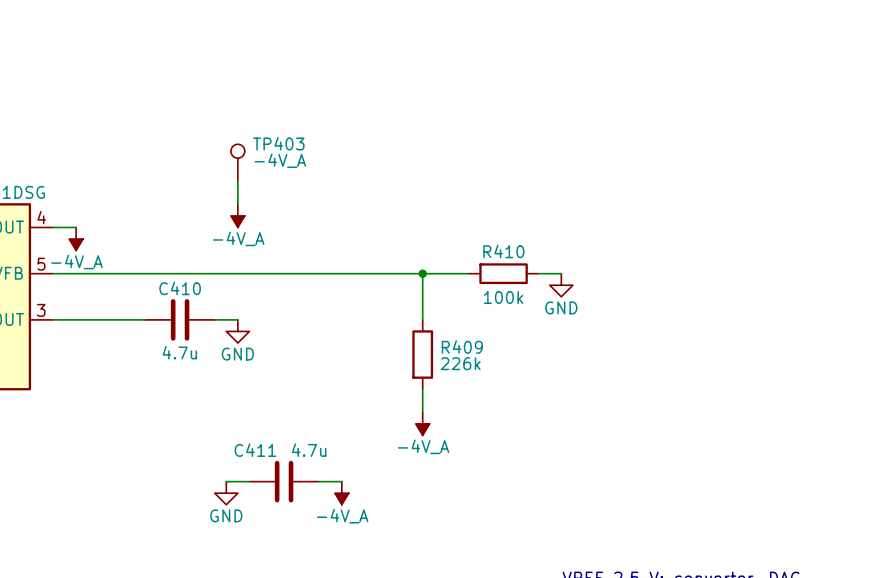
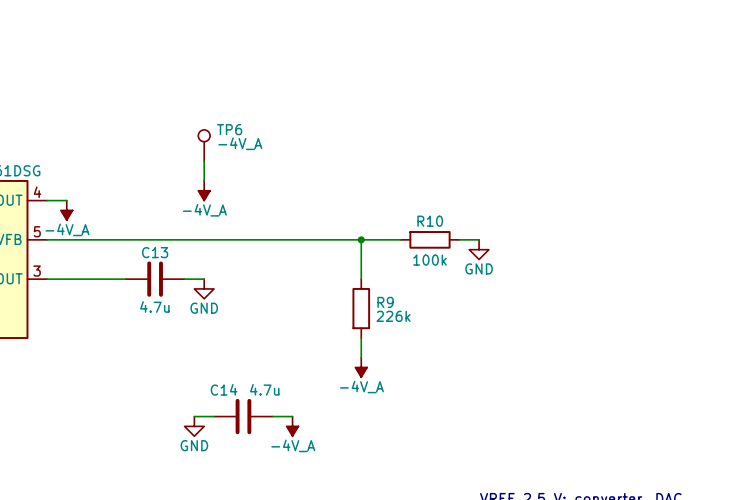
TP403 name: TP403 (278, 143) -> TP6 (229, 129)
R410 name: R410 (503, 251) -> R10 (430, 221)
C410 name: C410 (180, 288) -> C13 (155, 252)
R409 name: R409 (462, 347) -> R9 (385, 302)
C411 name: C411 (255, 450) -> C14 (224, 389)

